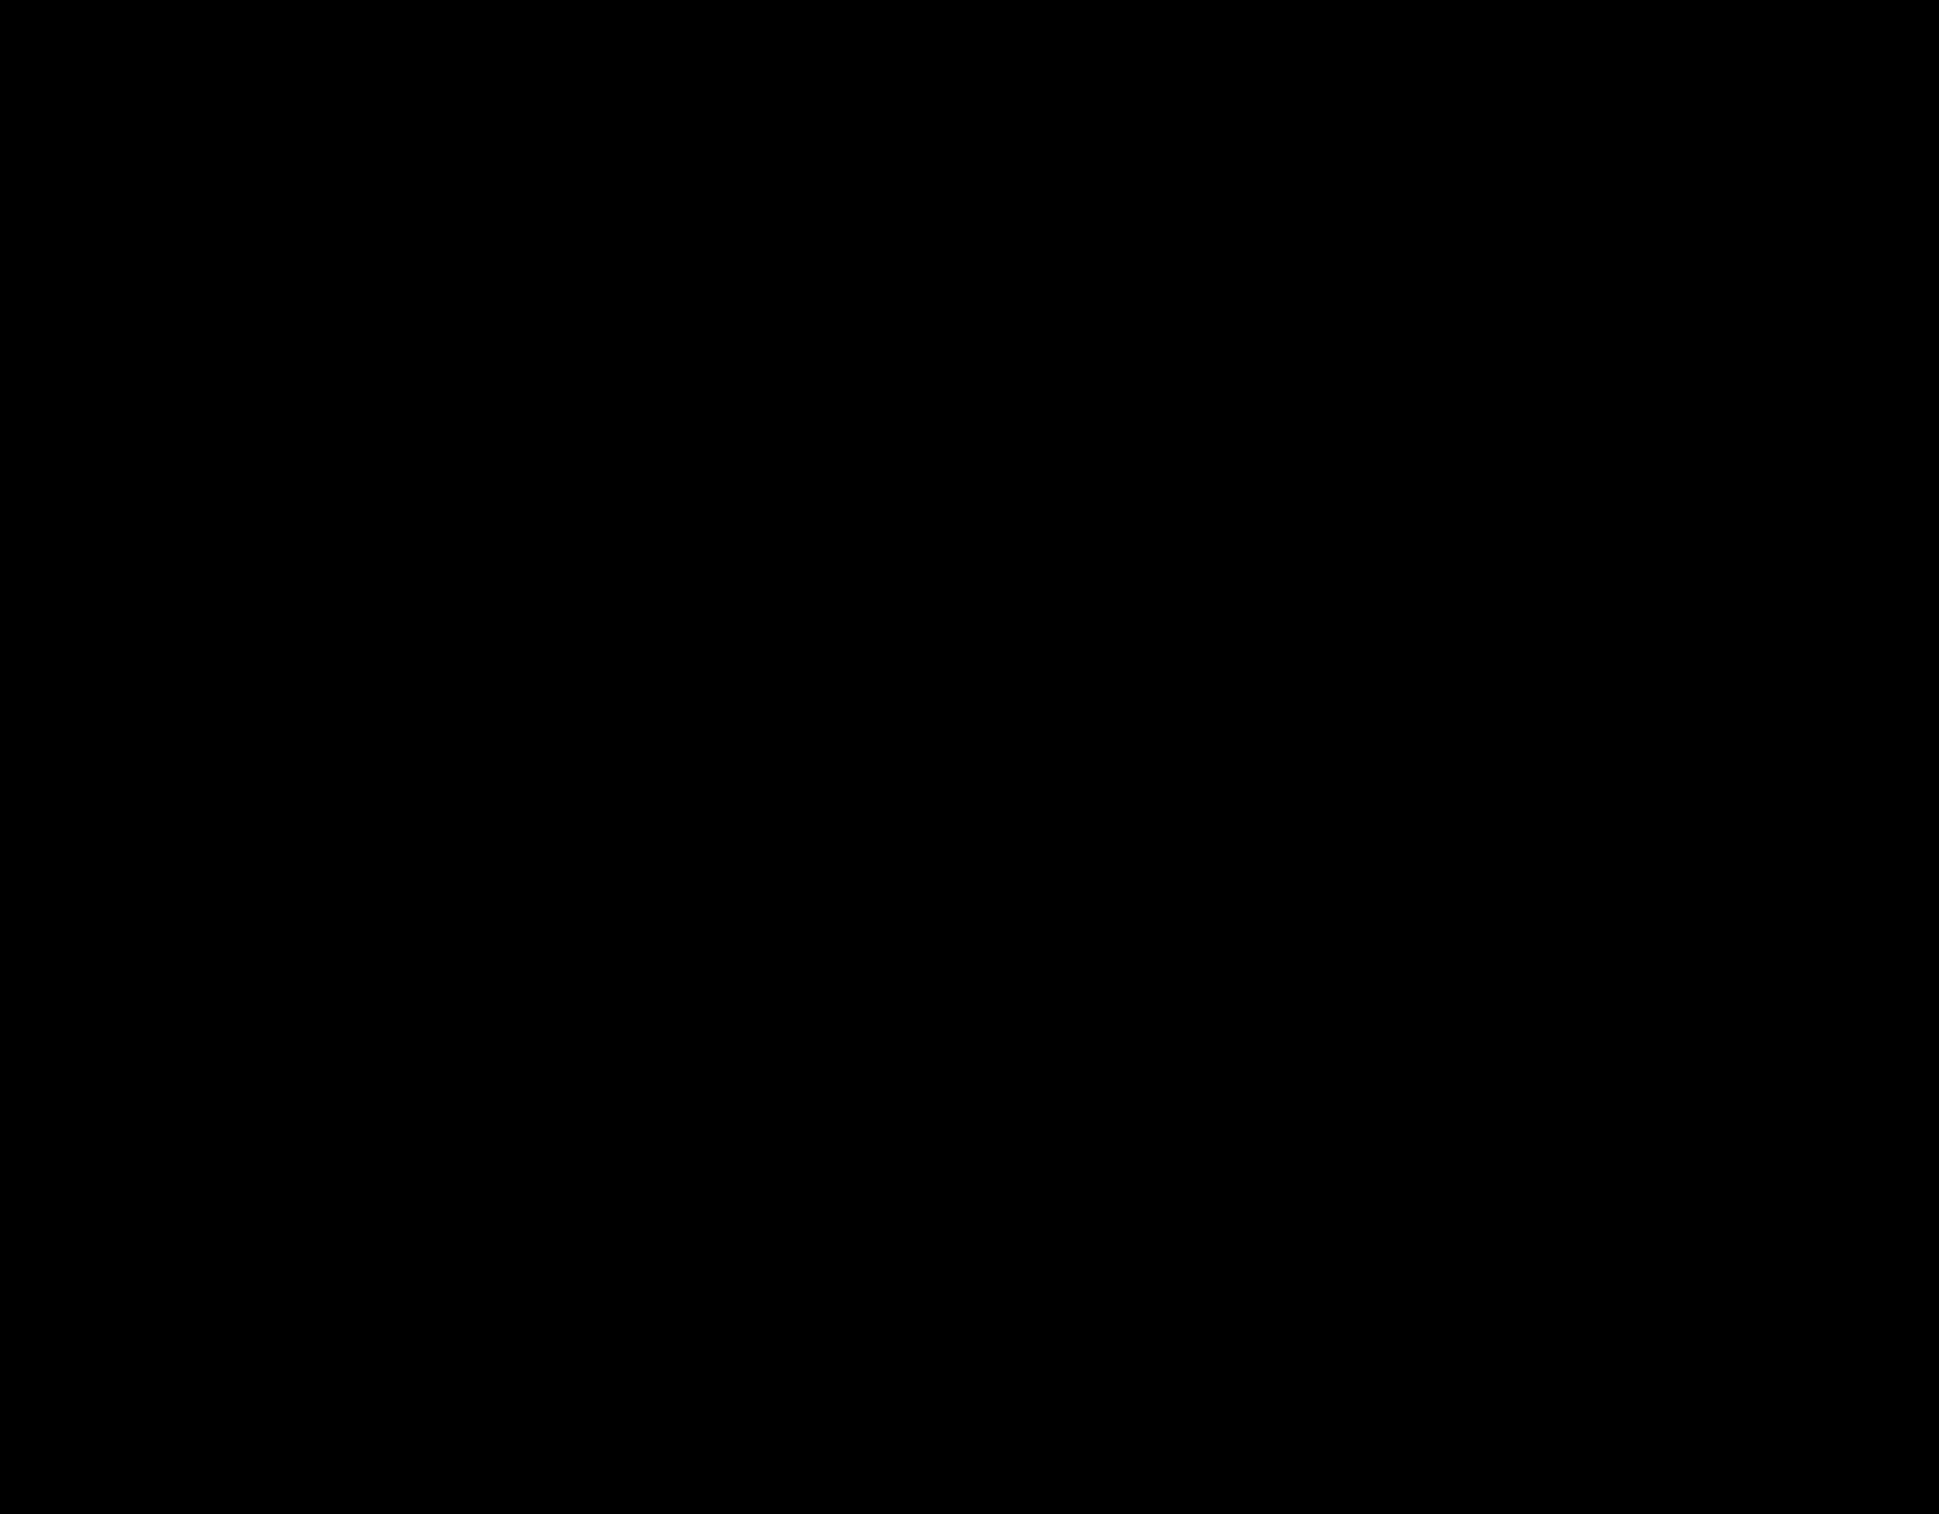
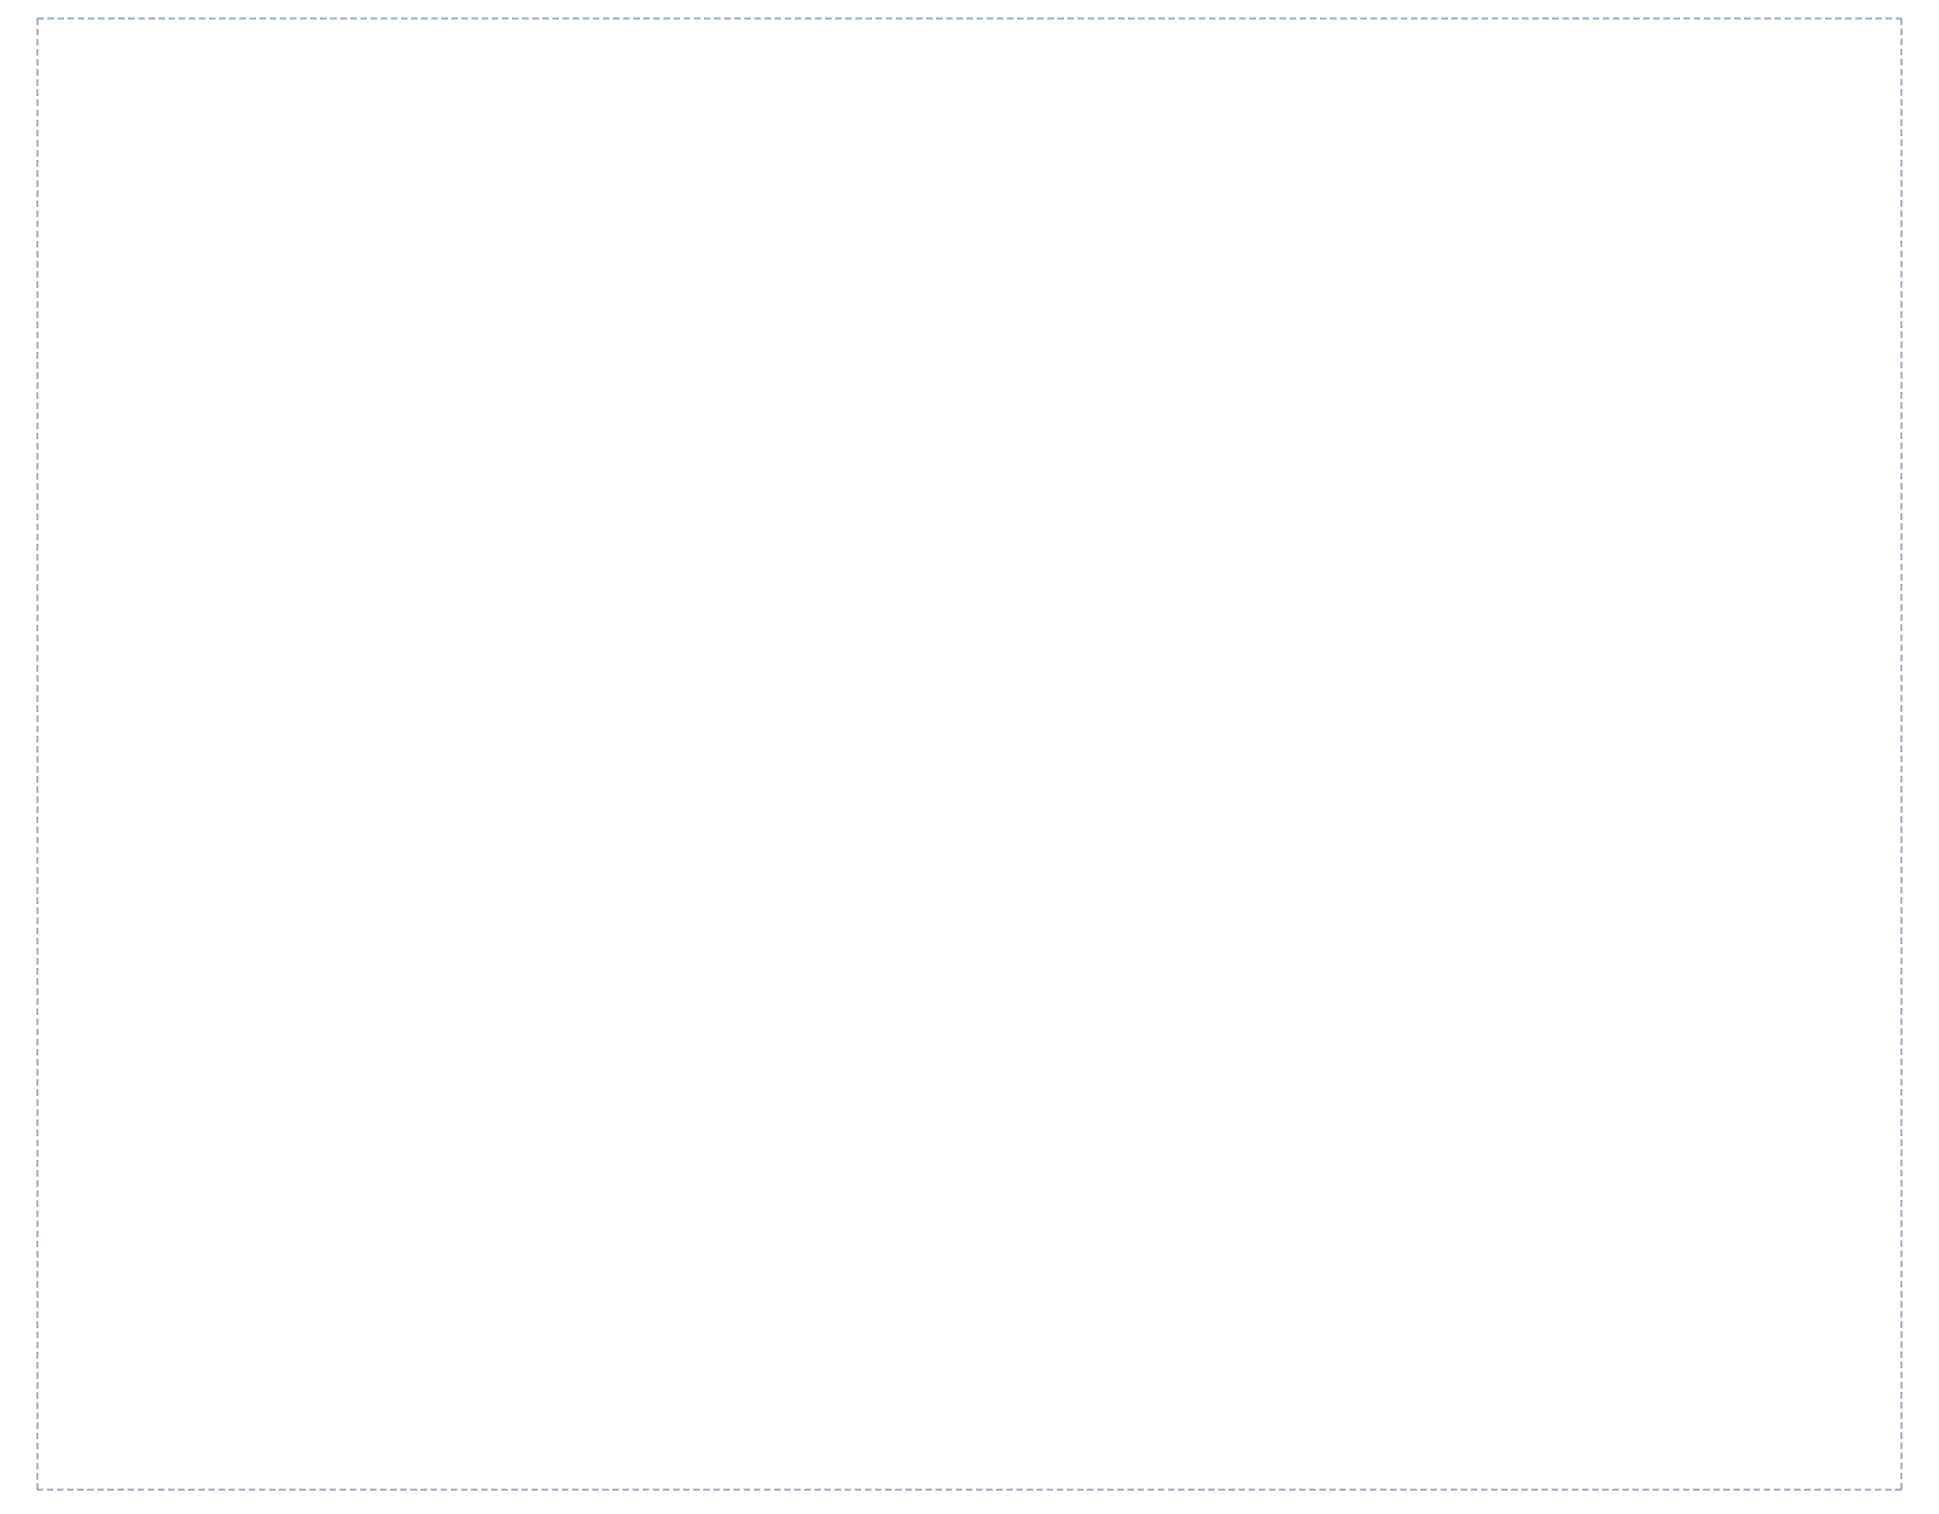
bottom zone outline: none -> (1901, 18) (37, 18) (37, 1489) (1901, 1489) (1901, 18)

